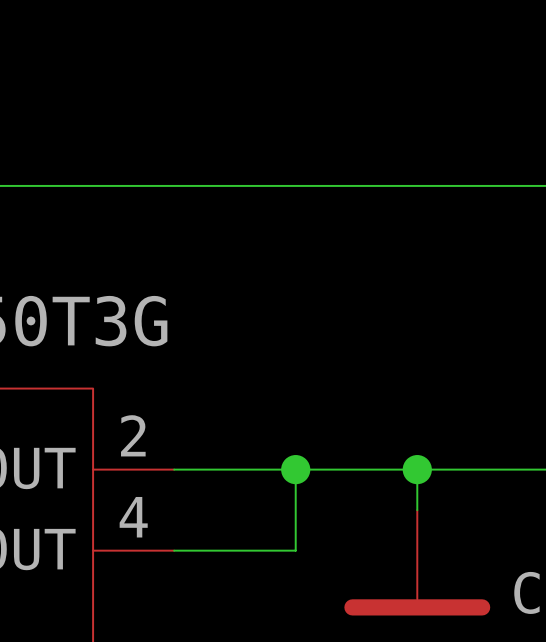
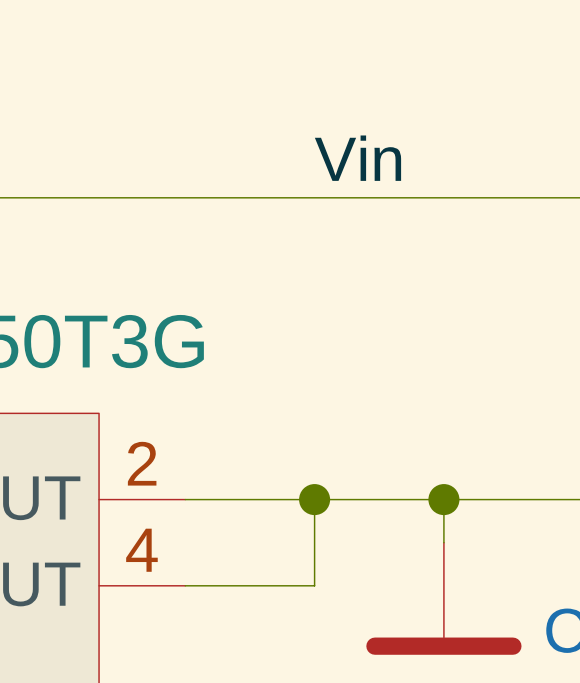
label: none -> Vin (357, 158)

